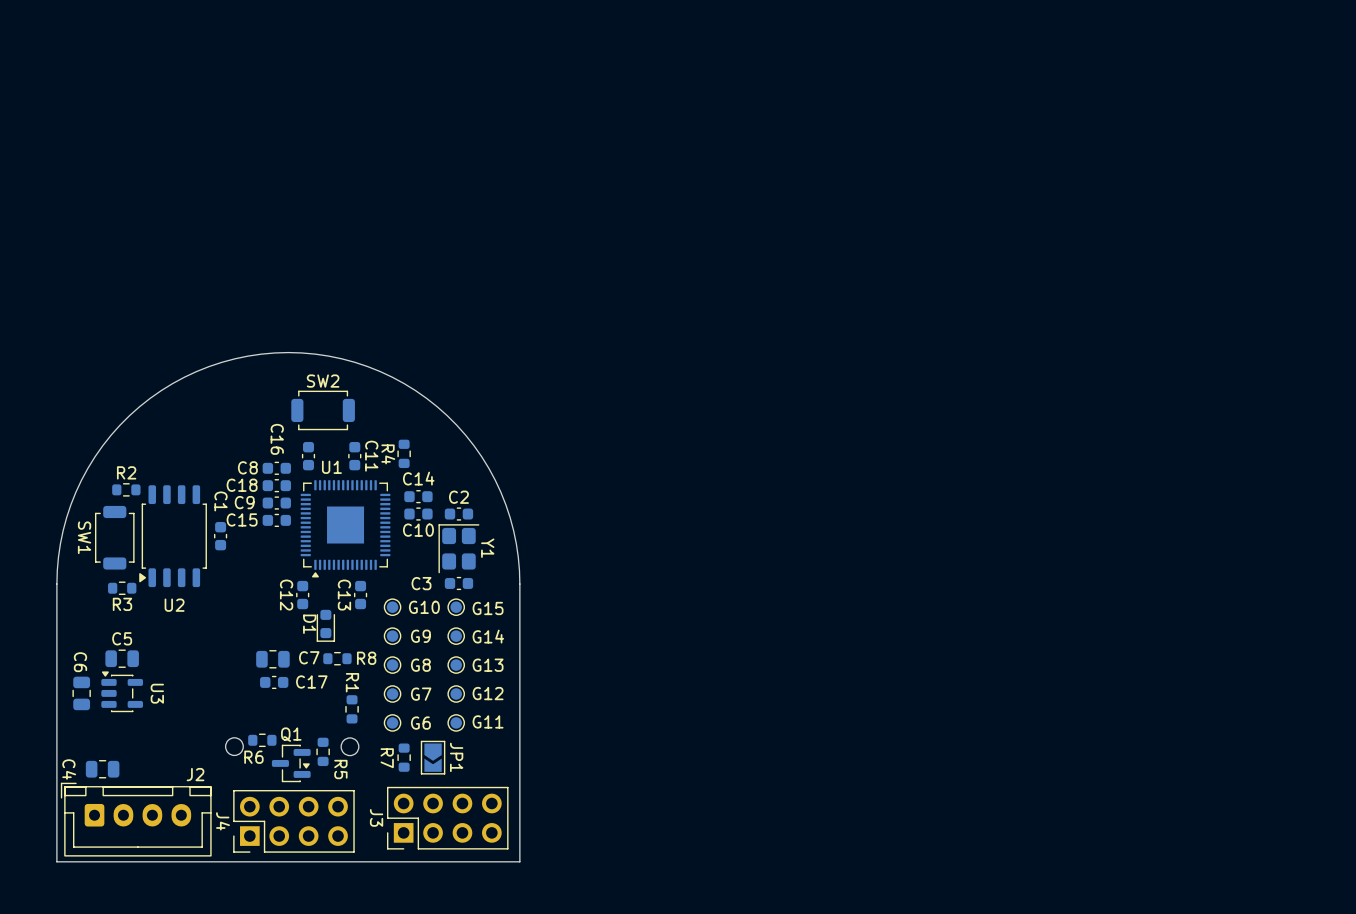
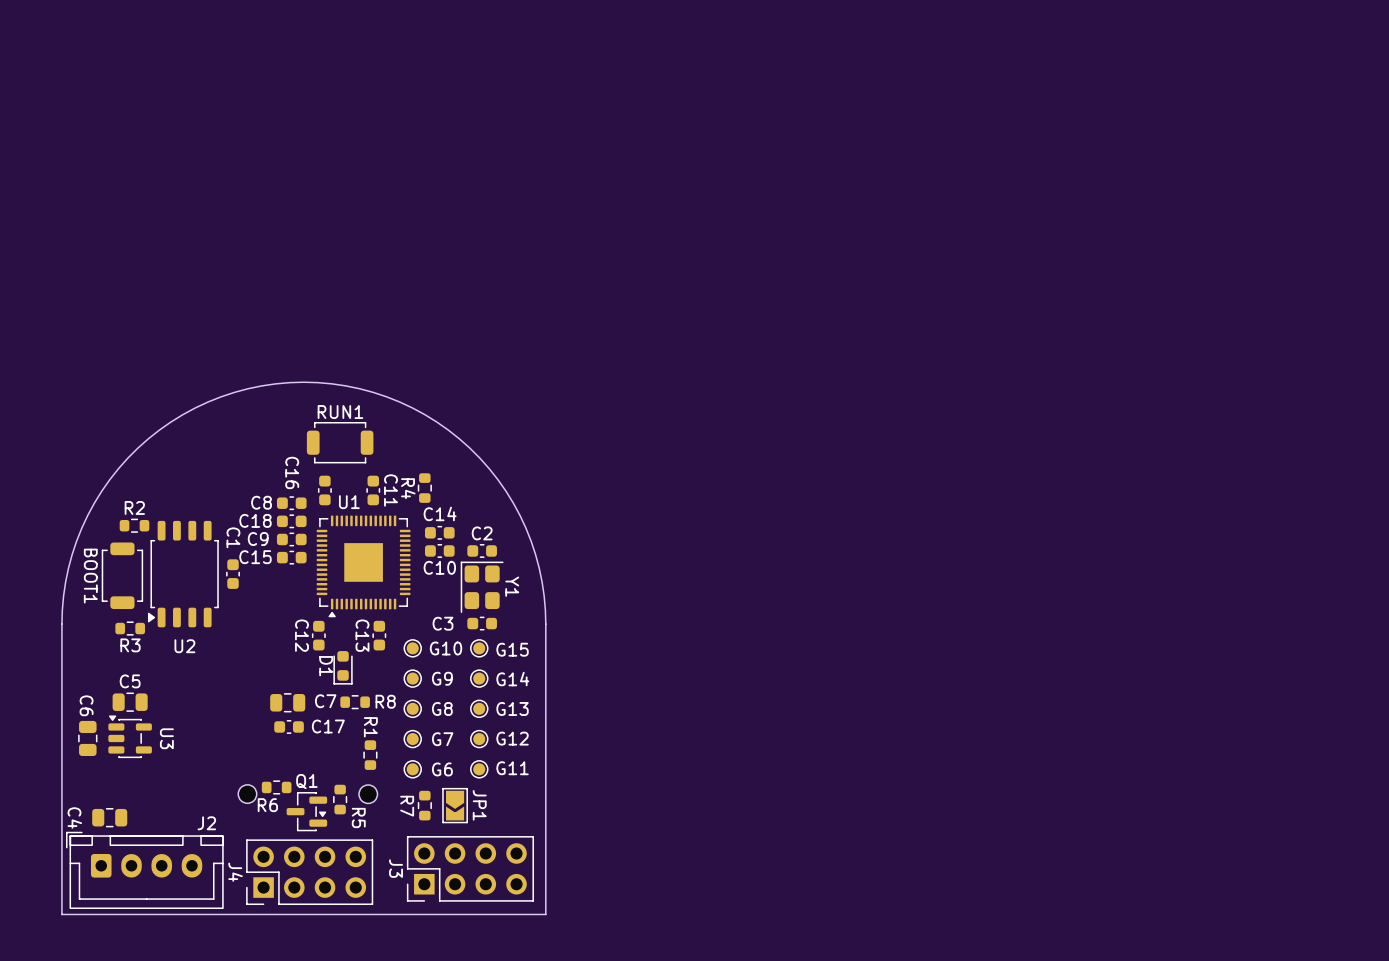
SW2 name: SW2 (323, 381) -> RUN1 (340, 412)
SW1 name: SW1 (84, 537) -> BOOT1 (90, 576)

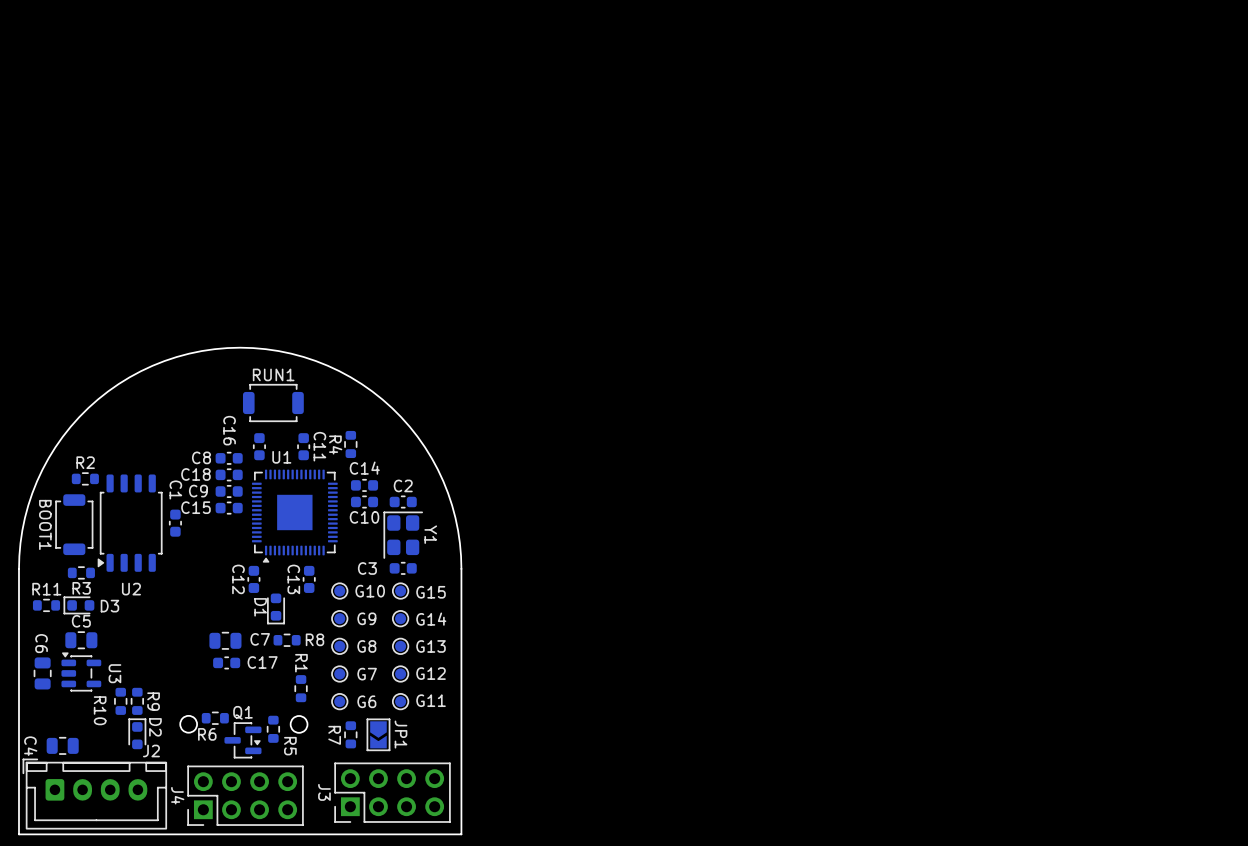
R11: none -> (46, 605)
D3: none -> (79, 605)
R10: none -> (120, 701)
R9: none -> (137, 701)
D2: none -> (137, 733)

